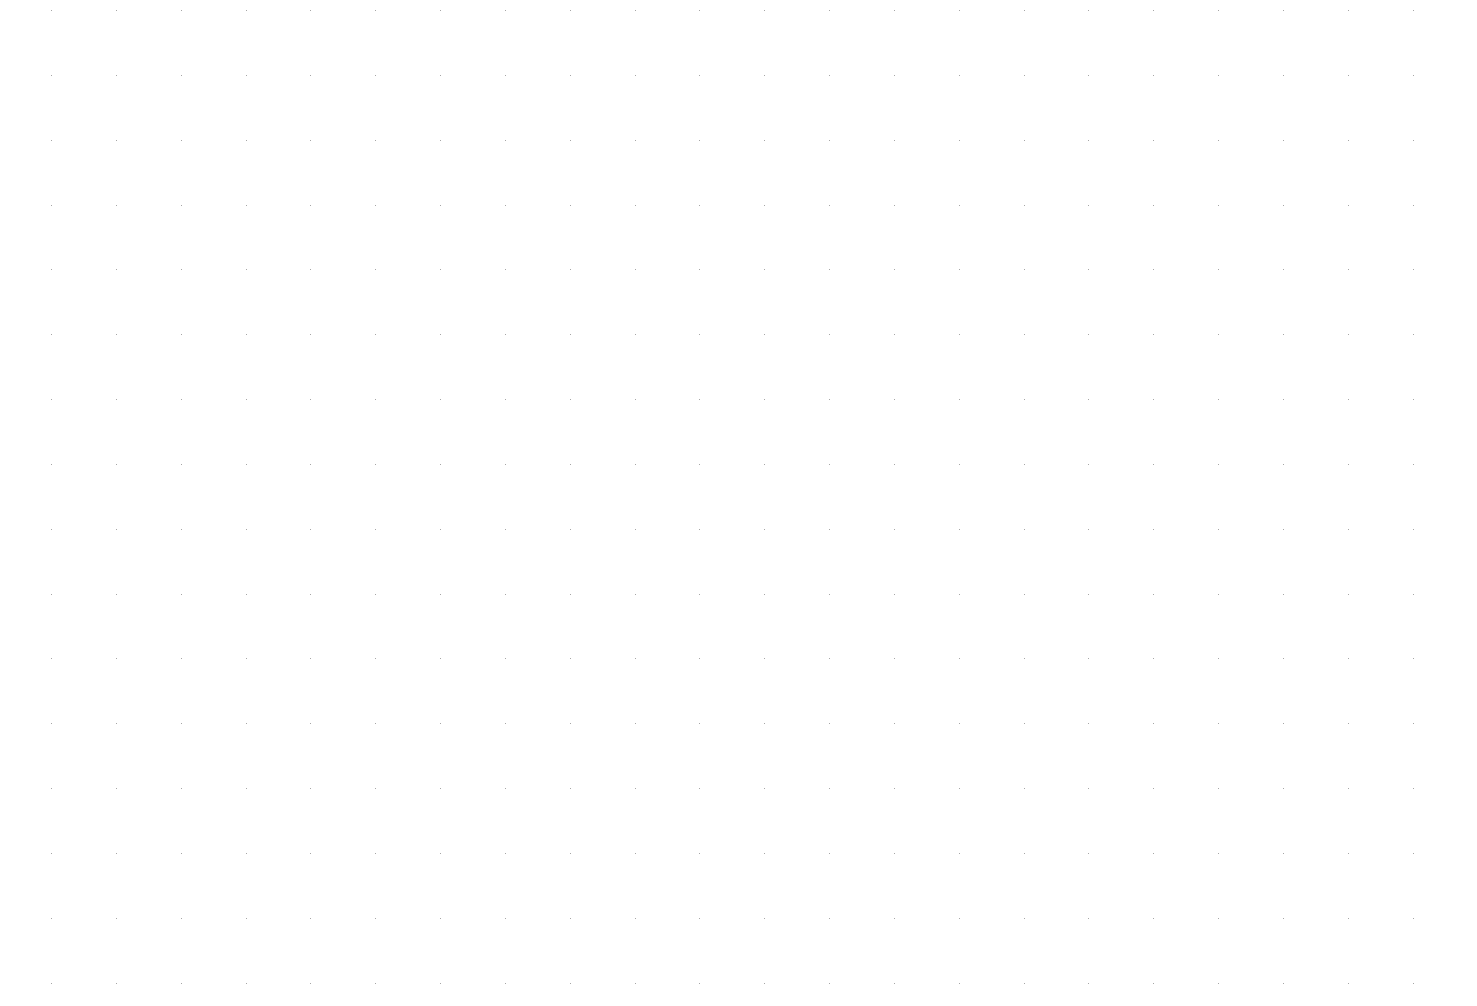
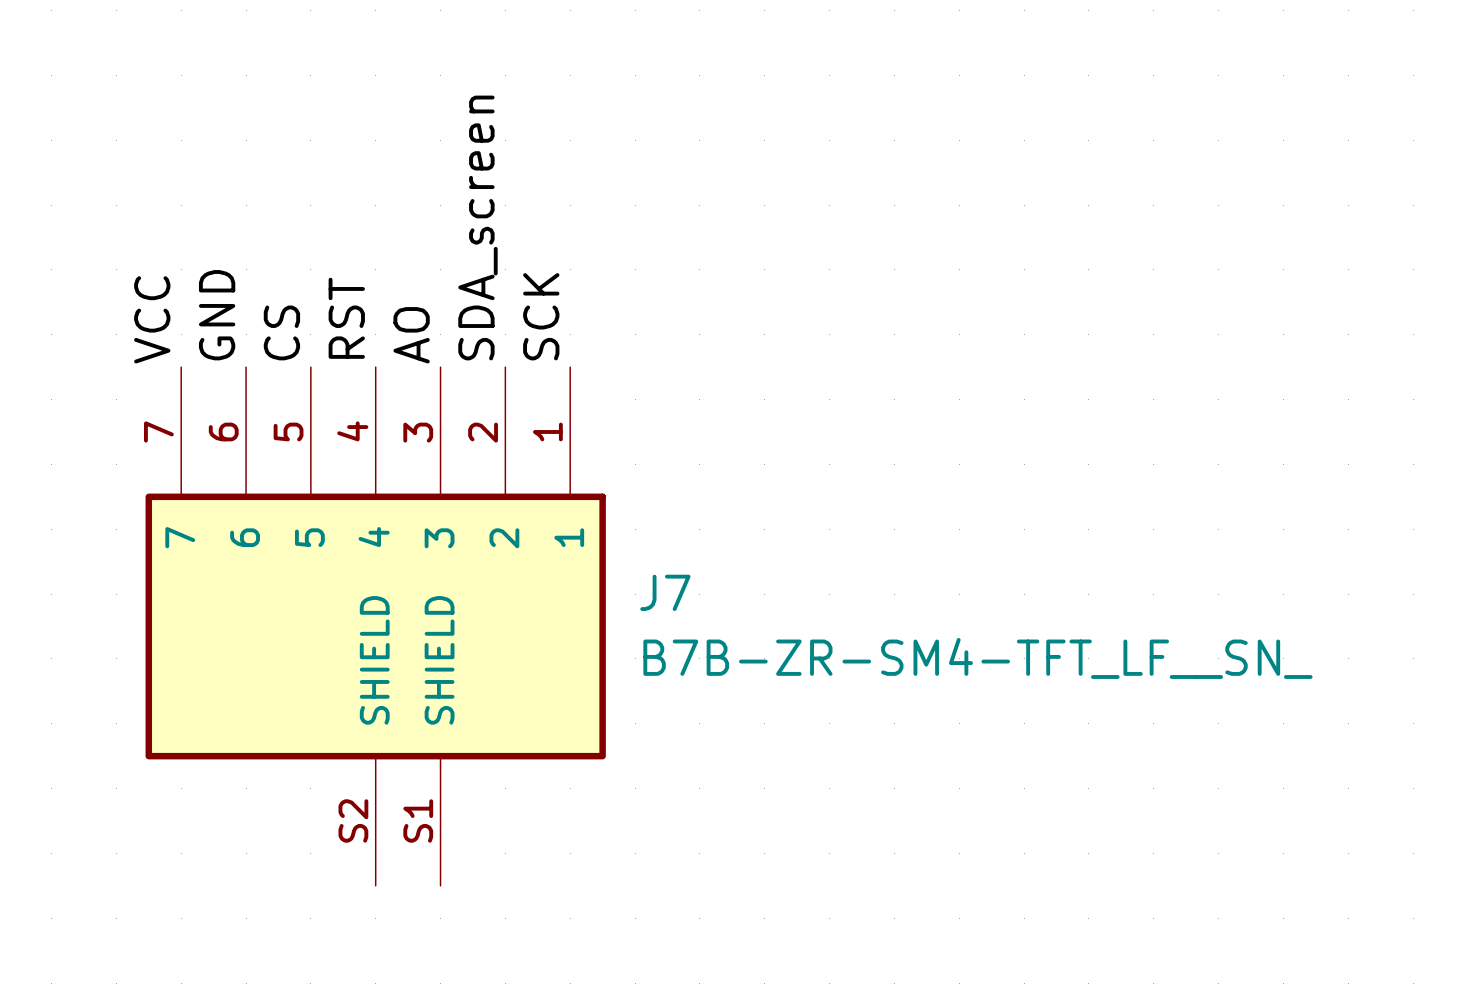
label: none -> SDA_screen (477, 227)
label: none -> GND (217, 315)
label: none -> SCK (541, 316)
label: none -> RST (346, 318)
label: none -> VCC (152, 319)
label: none -> CS (281, 332)
label: none -> AO (411, 335)
J7: none -> B7B-ZR-SM4-TFT_LF__SN_ (375, 626)

